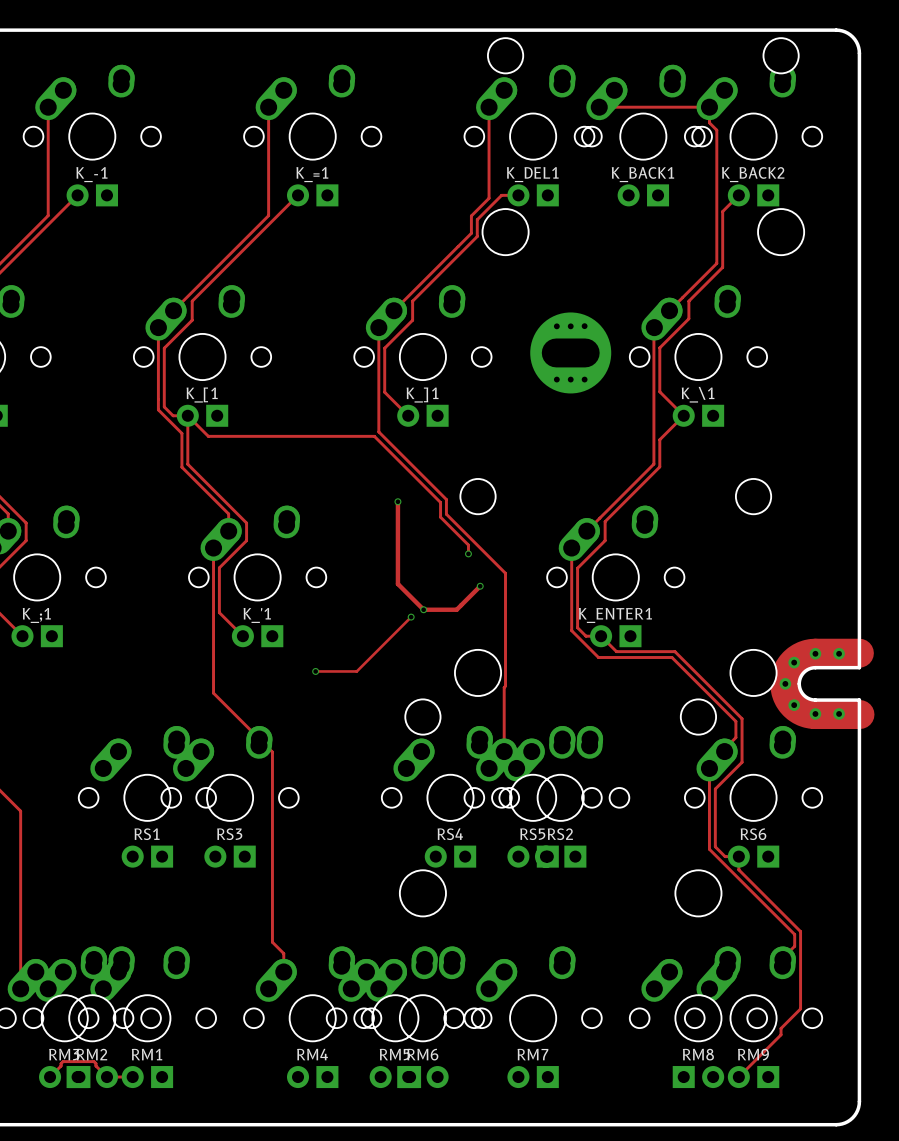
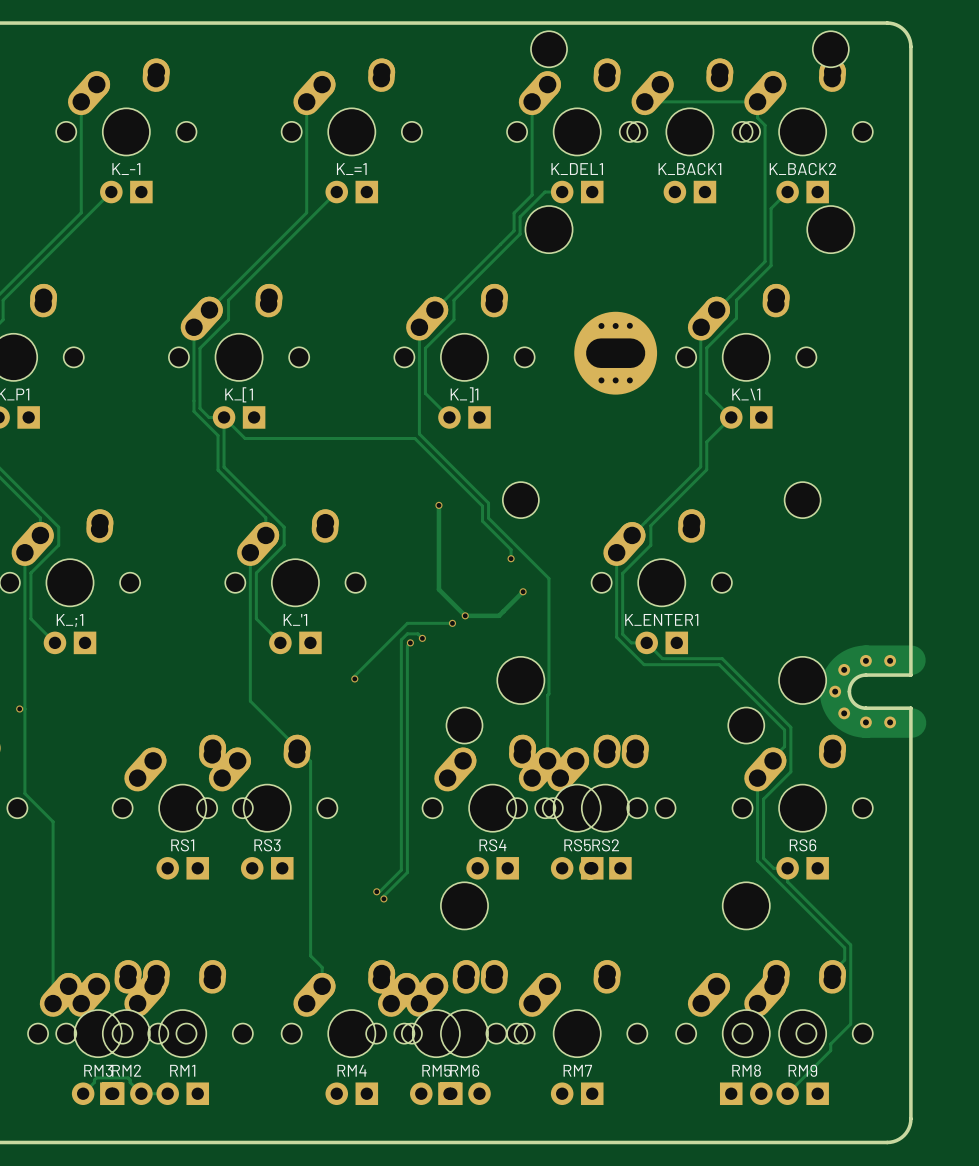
track: (411, 617) (356, 671) (315, 671) -> (452, 623) (407, 623) (354, 675) (354, 678)
track: none -> (422, 638) (417, 633) (407, 633) (401, 639) (401, 870) (379, 891) (376, 891)
via: none -> (422, 638)
track: none -> (410, 642) (407, 645) (407, 872) (383, 896) (383, 898)
via: none -> (410, 642)
via: none -> (376, 891)
via: none -> (383, 898)

